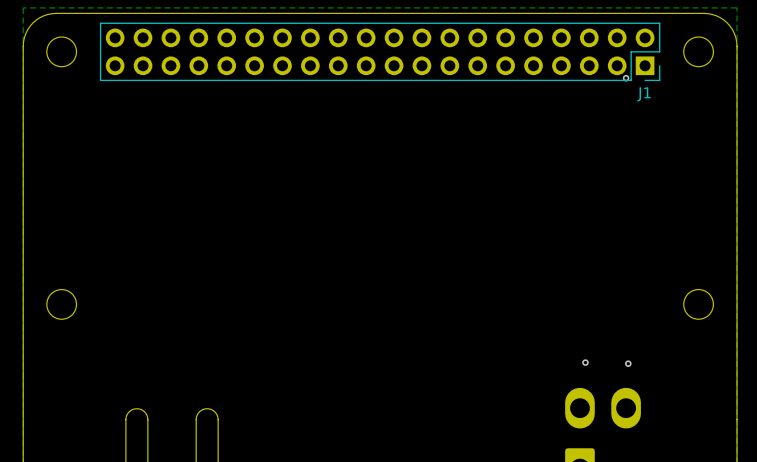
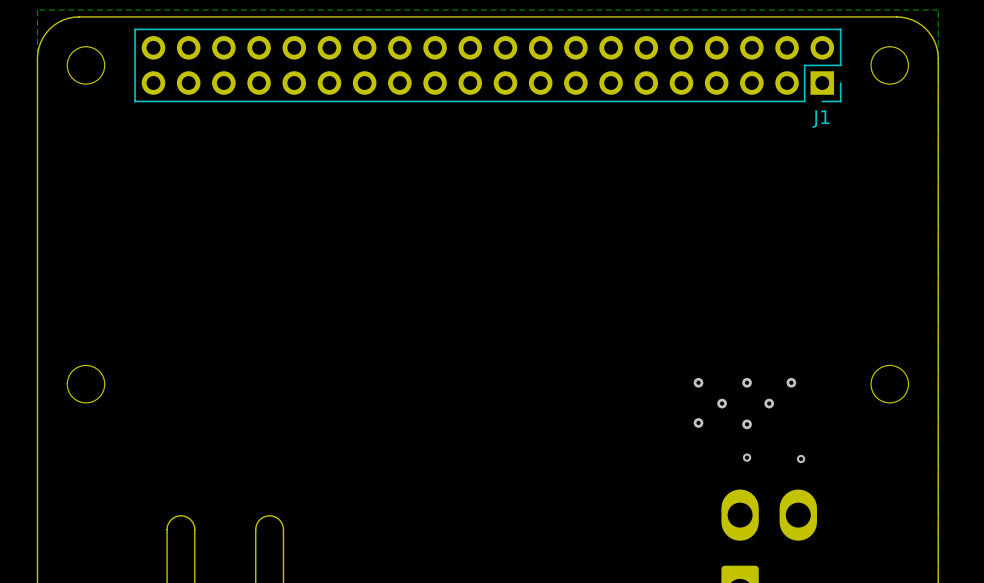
via: (626, 78) -> none
via: none -> (698, 382)
via: none -> (747, 382)
via: none -> (791, 382)
via: none -> (722, 403)
via: none -> (769, 403)
via: none -> (698, 422)
via: none -> (747, 424)

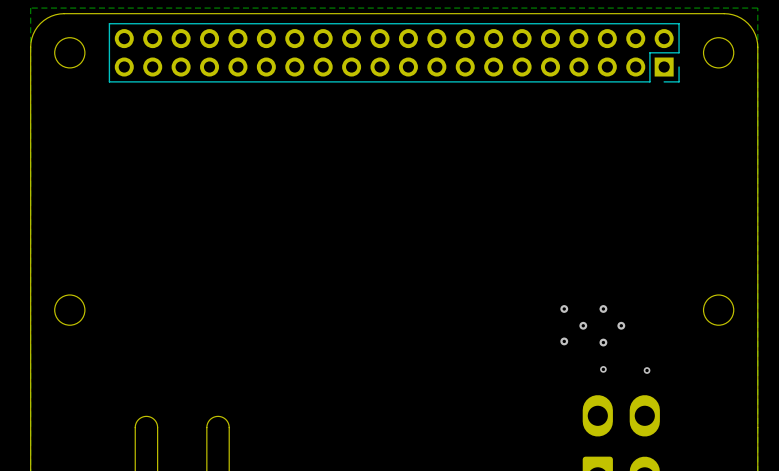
J1 name: J1 (820, 119) -> none
via: (791, 382) -> none

